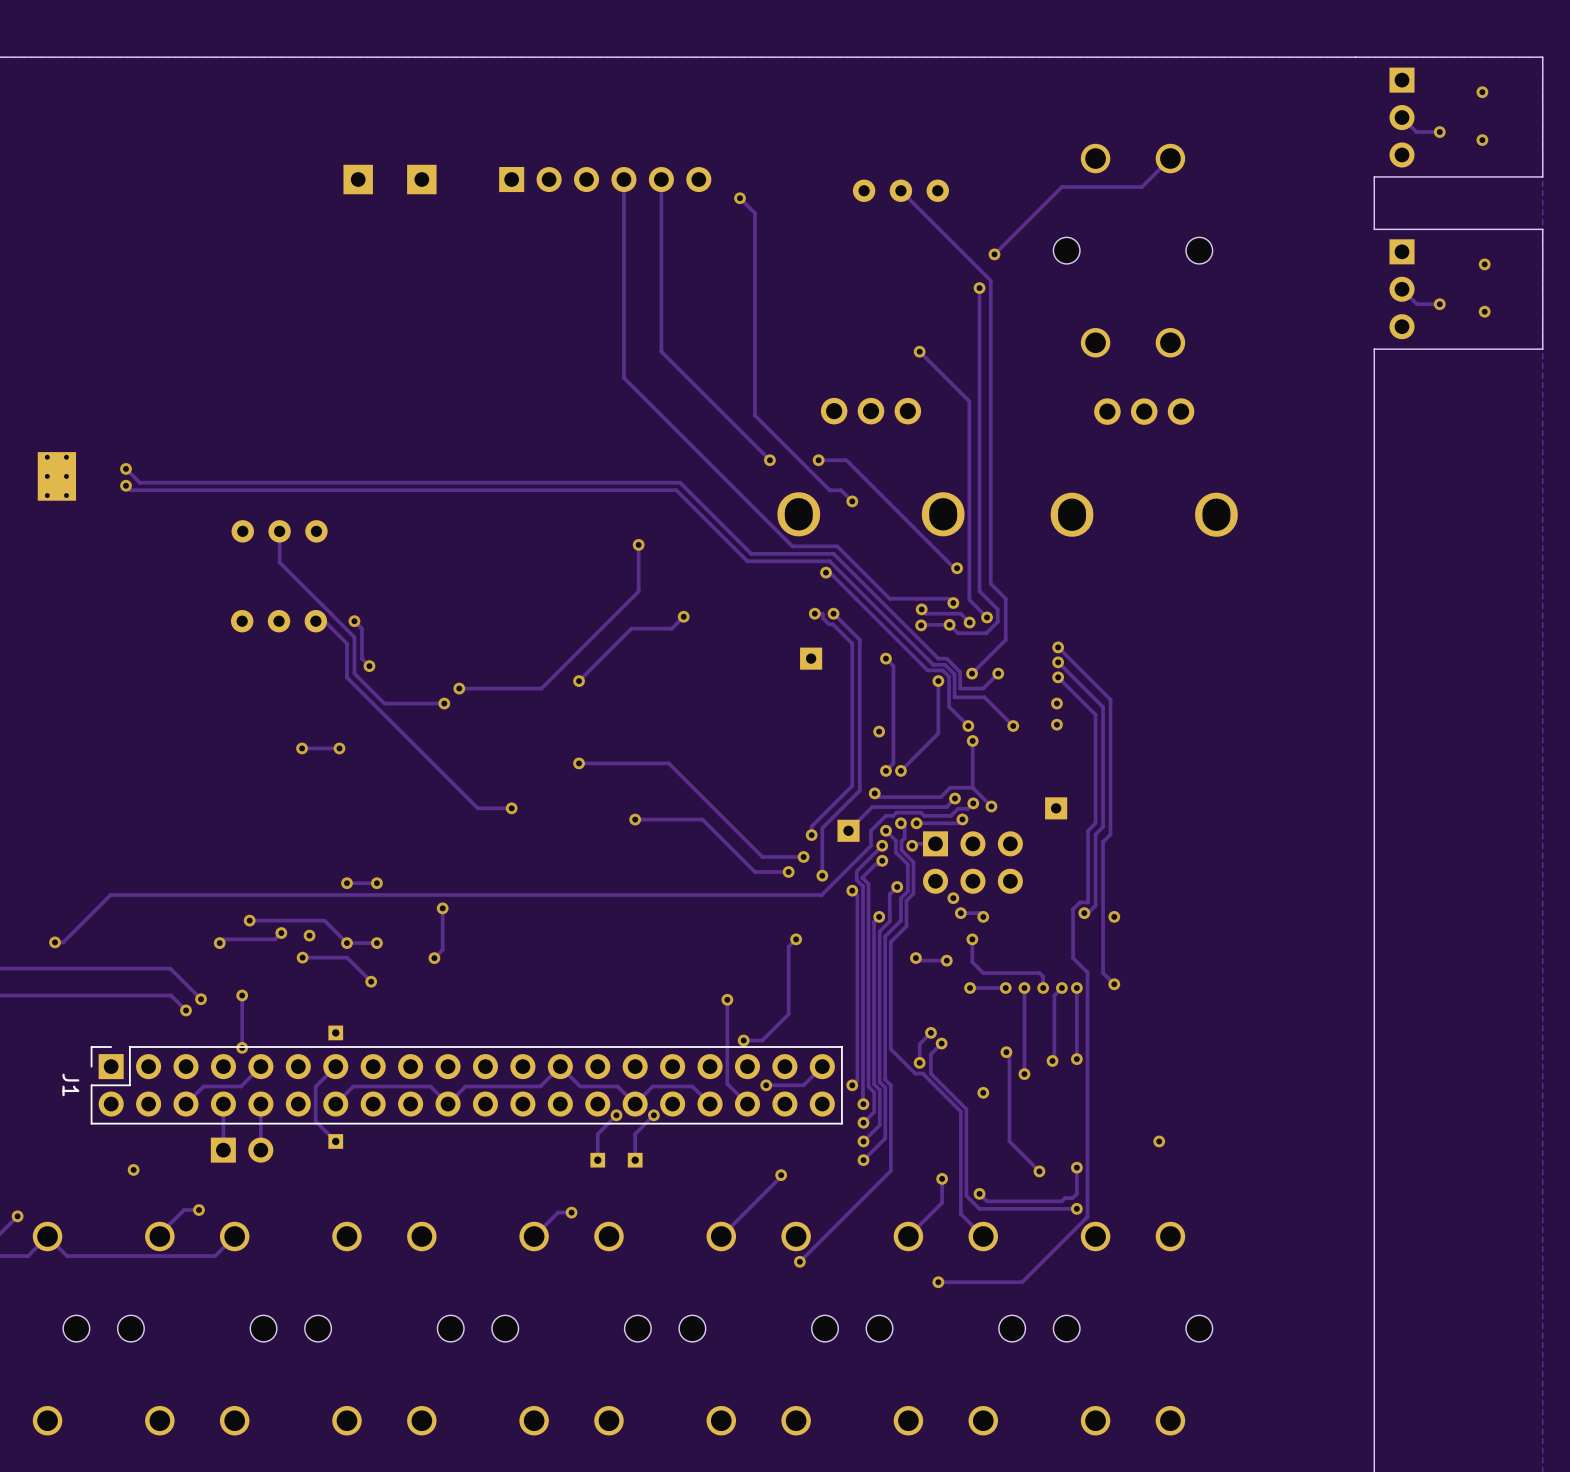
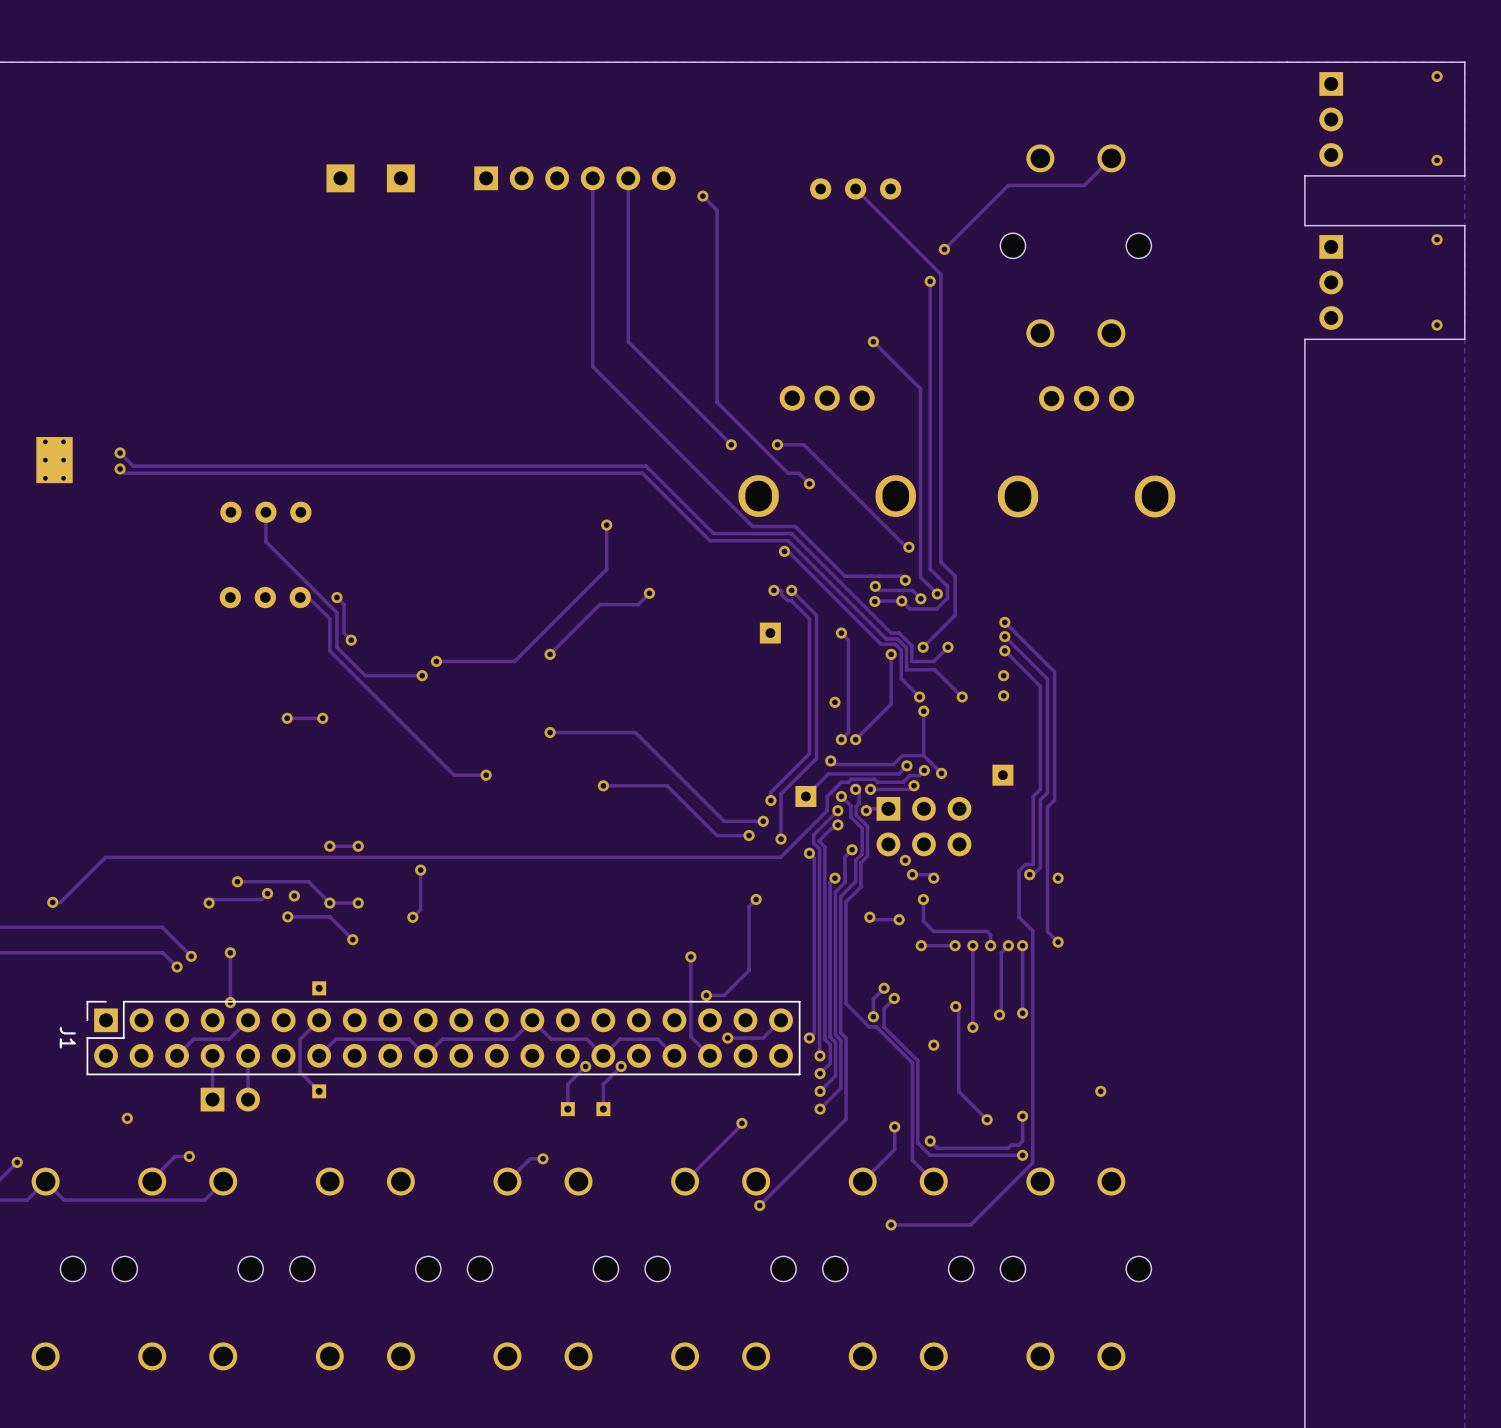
via position: (1482, 92) -> (1437, 76)
track: (1402, 117) (1416, 132) (1439, 132) -> none
via: (1439, 132) -> none
via: (1482, 140) -> none
via: none -> (1437, 160)
via position: (1484, 264) -> (1437, 239)
track: (1402, 289) (1416, 304) (1439, 304) -> none
via: (1439, 304) -> none
via position: (1484, 311) -> (1437, 325)

